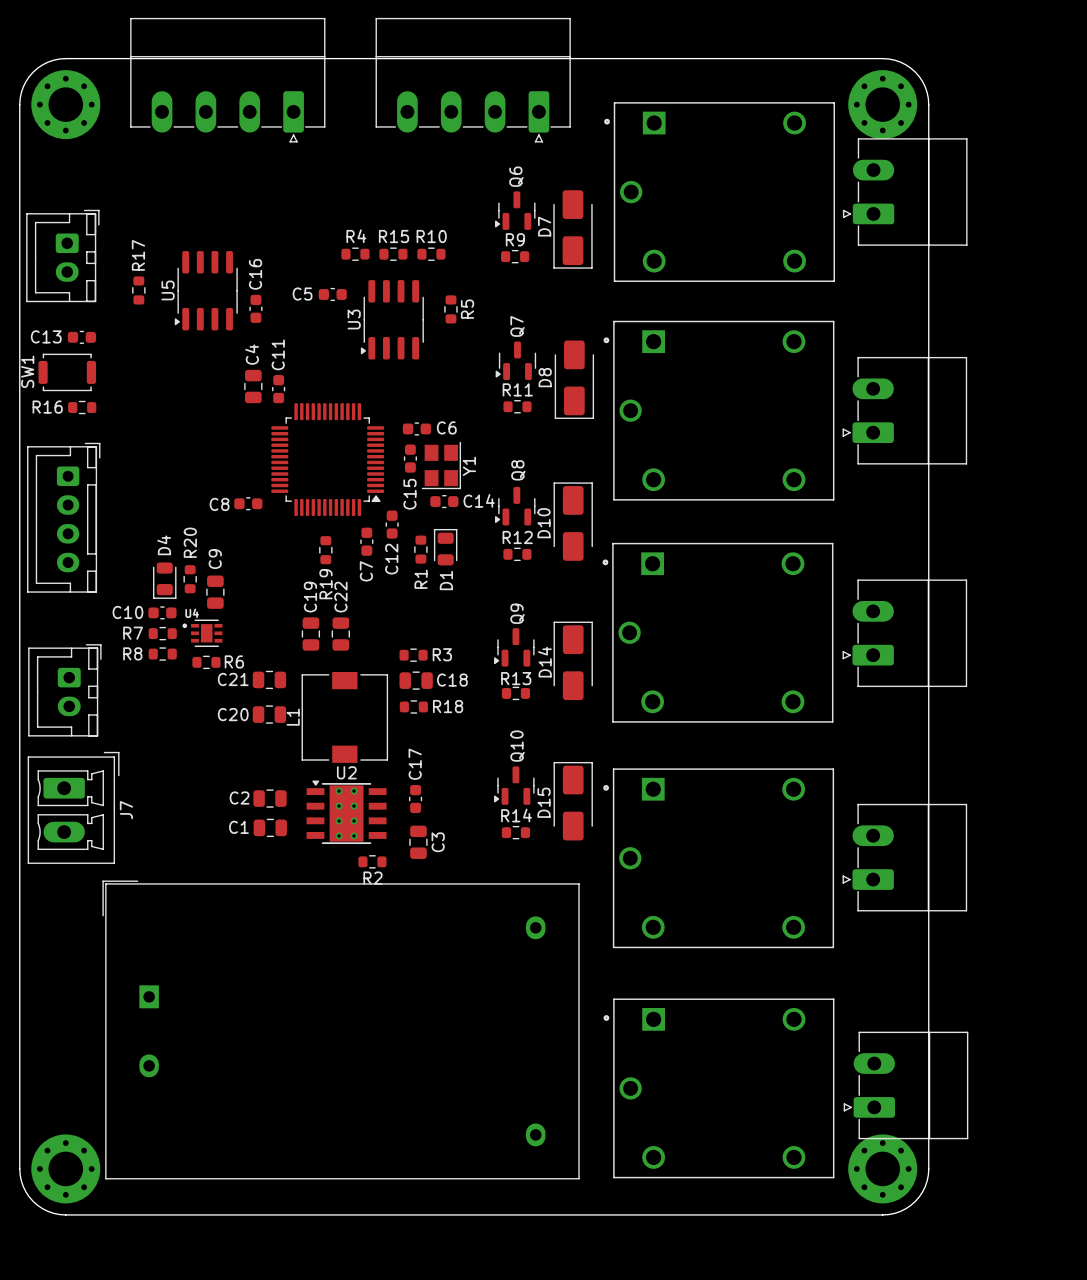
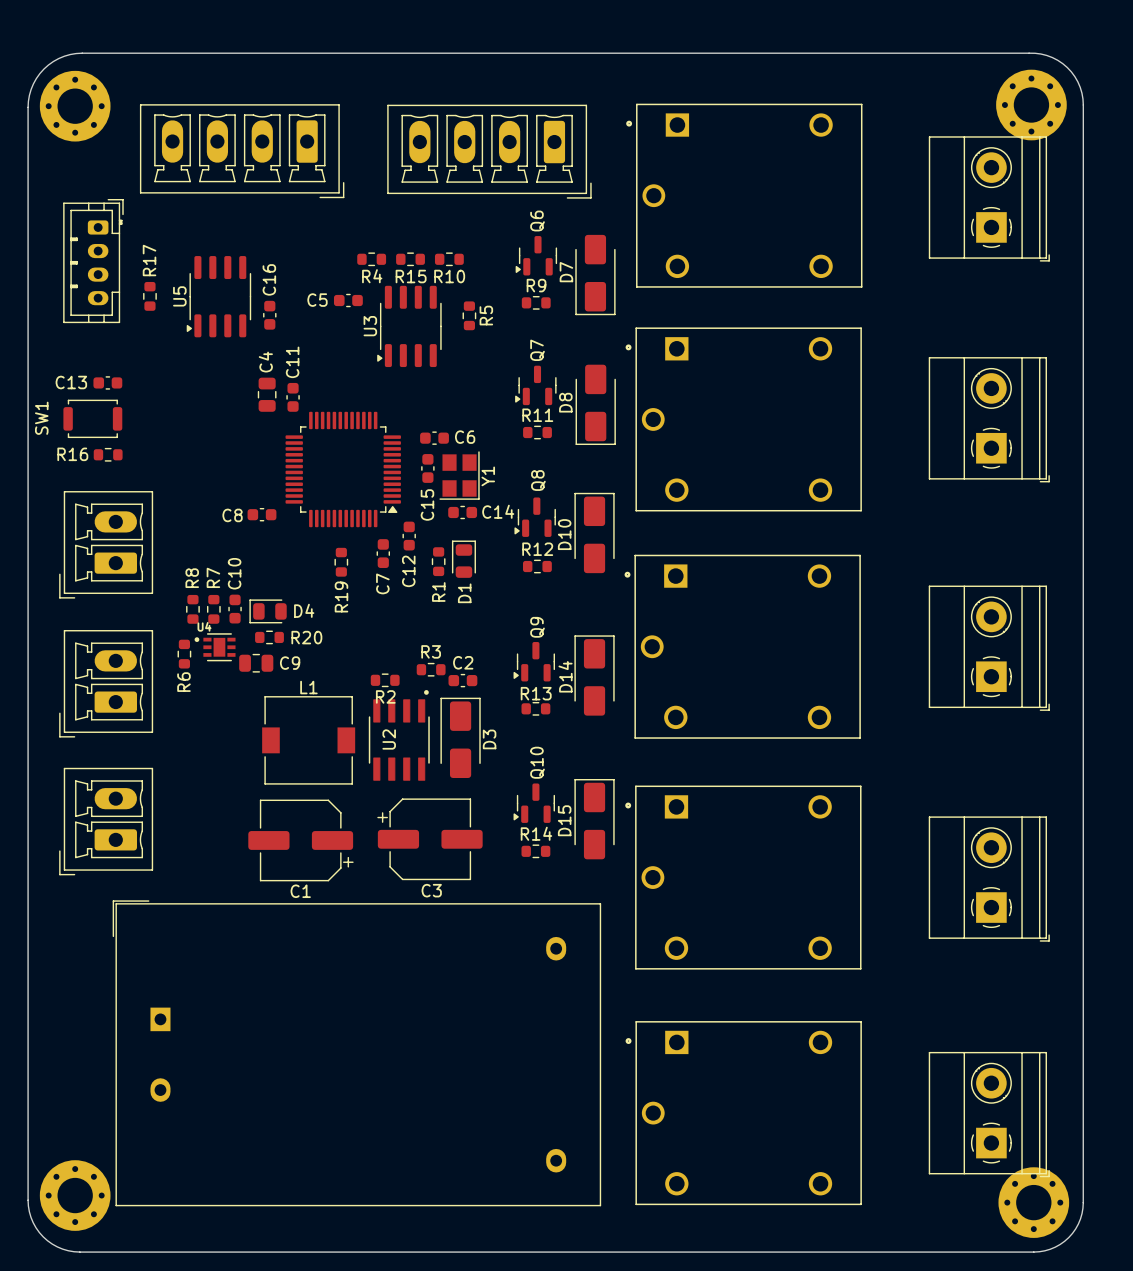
part: (227, 80) -> none
part: (473, 80) -> none
part position: (882, 104) -> (1031, 105)
board edge: (19, 105) (23, 87) (33, 72) (48, 62) (65, 58) (882, 58) (900, 62) (915, 72) (925, 87) (928, 104) (928, 1168) (925, 1186) (919, 1196) (905, 1208) (894, 1213) (882, 1214) (65, 1214) (48, 1211) (33, 1201) (23, 1186) (19, 1168) -> (28, 107) (33, 83) (43, 69) (58, 58) (82, 53) (1035, 53) (1052, 57) (1067, 67) (1077, 81) (1083, 105) (1083, 1202) (1080, 1218) (1068, 1237) (1050, 1249) (1033, 1252) (79, 1252) (57, 1246) (43, 1236) (30, 1217) (28, 1195)
part: none -> (242, 151)
part: none -> (489, 151)
part: (905, 192) -> none
part: none -> (989, 198)
Q6 position: (515, 210) -> (536, 255)
D7 position: (572, 229) -> (595, 275)
R4 name position: R4 (356, 236) -> R4 (372, 276)
R15 name position: R15 (394, 236) -> R15 (411, 276)
R10 name position: R10 (431, 236) -> R10 (449, 276)
part: (62, 255) -> none
part: none -> (93, 261)
R9 position: (515, 256) -> (536, 302)
C13 position: (81, 337) -> (107, 382)
Q7 position: (515, 360) -> (535, 385)
SW1 name position: SW1 (27, 371) -> SW1 (41, 418)
SW1 position: (67, 372) -> (92, 418)
D8 position: (574, 379) -> (595, 404)
R11 position: (517, 406) -> (537, 432)
R16 position: (82, 407) -> (108, 454)
part: (904, 410) -> none
part: none -> (989, 419)
part: (63, 517) -> none
part: none -> (106, 544)
R20 rotation: 0° (190, 579) -> 90° clockwise (269, 637)
R20 position: (190, 579) -> (269, 637)
D4 rotation: 0° (164, 580) -> 90° clockwise (268, 611)
D4 position: (164, 580) -> (268, 611)
C9 rotation: 0° (215, 592) -> 90° clockwise (256, 663)
C9 position: (215, 592) -> (256, 663)
C10 rotation: 0° (162, 612) -> 90° clockwise (235, 609)
C10 position: (162, 612) -> (235, 609)
R7 rotation: 0° (162, 633) -> 90° clockwise (213, 609)
R7 position: (162, 633) -> (213, 609)
part: (904, 633) -> none
C19: (310, 634) -> none
C22: (340, 634) -> none
part: none -> (989, 648)
R8 rotation: 0° (162, 654) -> 90° clockwise (192, 609)
R8 position: (162, 654) -> (192, 609)
R3 name position: R3 (442, 654) -> R3 (431, 651)
R6 rotation: 0° (206, 662) -> 90° clockwise (184, 654)
R6 position: (206, 662) -> (184, 654)
part: none -> (106, 683)
C21: (269, 679) -> none
C18: (416, 680) -> none
part: (64, 690) -> none
R18: (413, 706) -> none
C20: (269, 714) -> none
L1 rotation: 0° (344, 717) -> 90° clockwise (308, 740)
D3: none -> (460, 737)
U2 name position: U2 (346, 772) -> U2 (389, 739)
U2 footprint: [306, 780, 387, 845] -> [368, 690, 430, 781]
C2 footprint: [253, 789, 287, 808] -> [448, 673, 478, 688]
C2 name position: C2 (239, 798) -> C2 (463, 662)
C17: (415, 799) -> none
part: none -> (106, 821)
J7: (73, 807) -> none
C1 footprint: [253, 818, 288, 838] -> [248, 799, 354, 882]
C3 footprint: [409, 825, 428, 859] -> [377, 798, 483, 881]
C1 name position: C1 (238, 827) -> C1 (300, 891)
C3 name position: C3 (438, 842) -> C3 (431, 890)
part: (904, 857) -> none
part: none -> (989, 879)
R2 position: (372, 861) -> (385, 680)
part: (906, 1085) -> none
part: none -> (989, 1114)
part position: (882, 1168) -> (1033, 1202)

